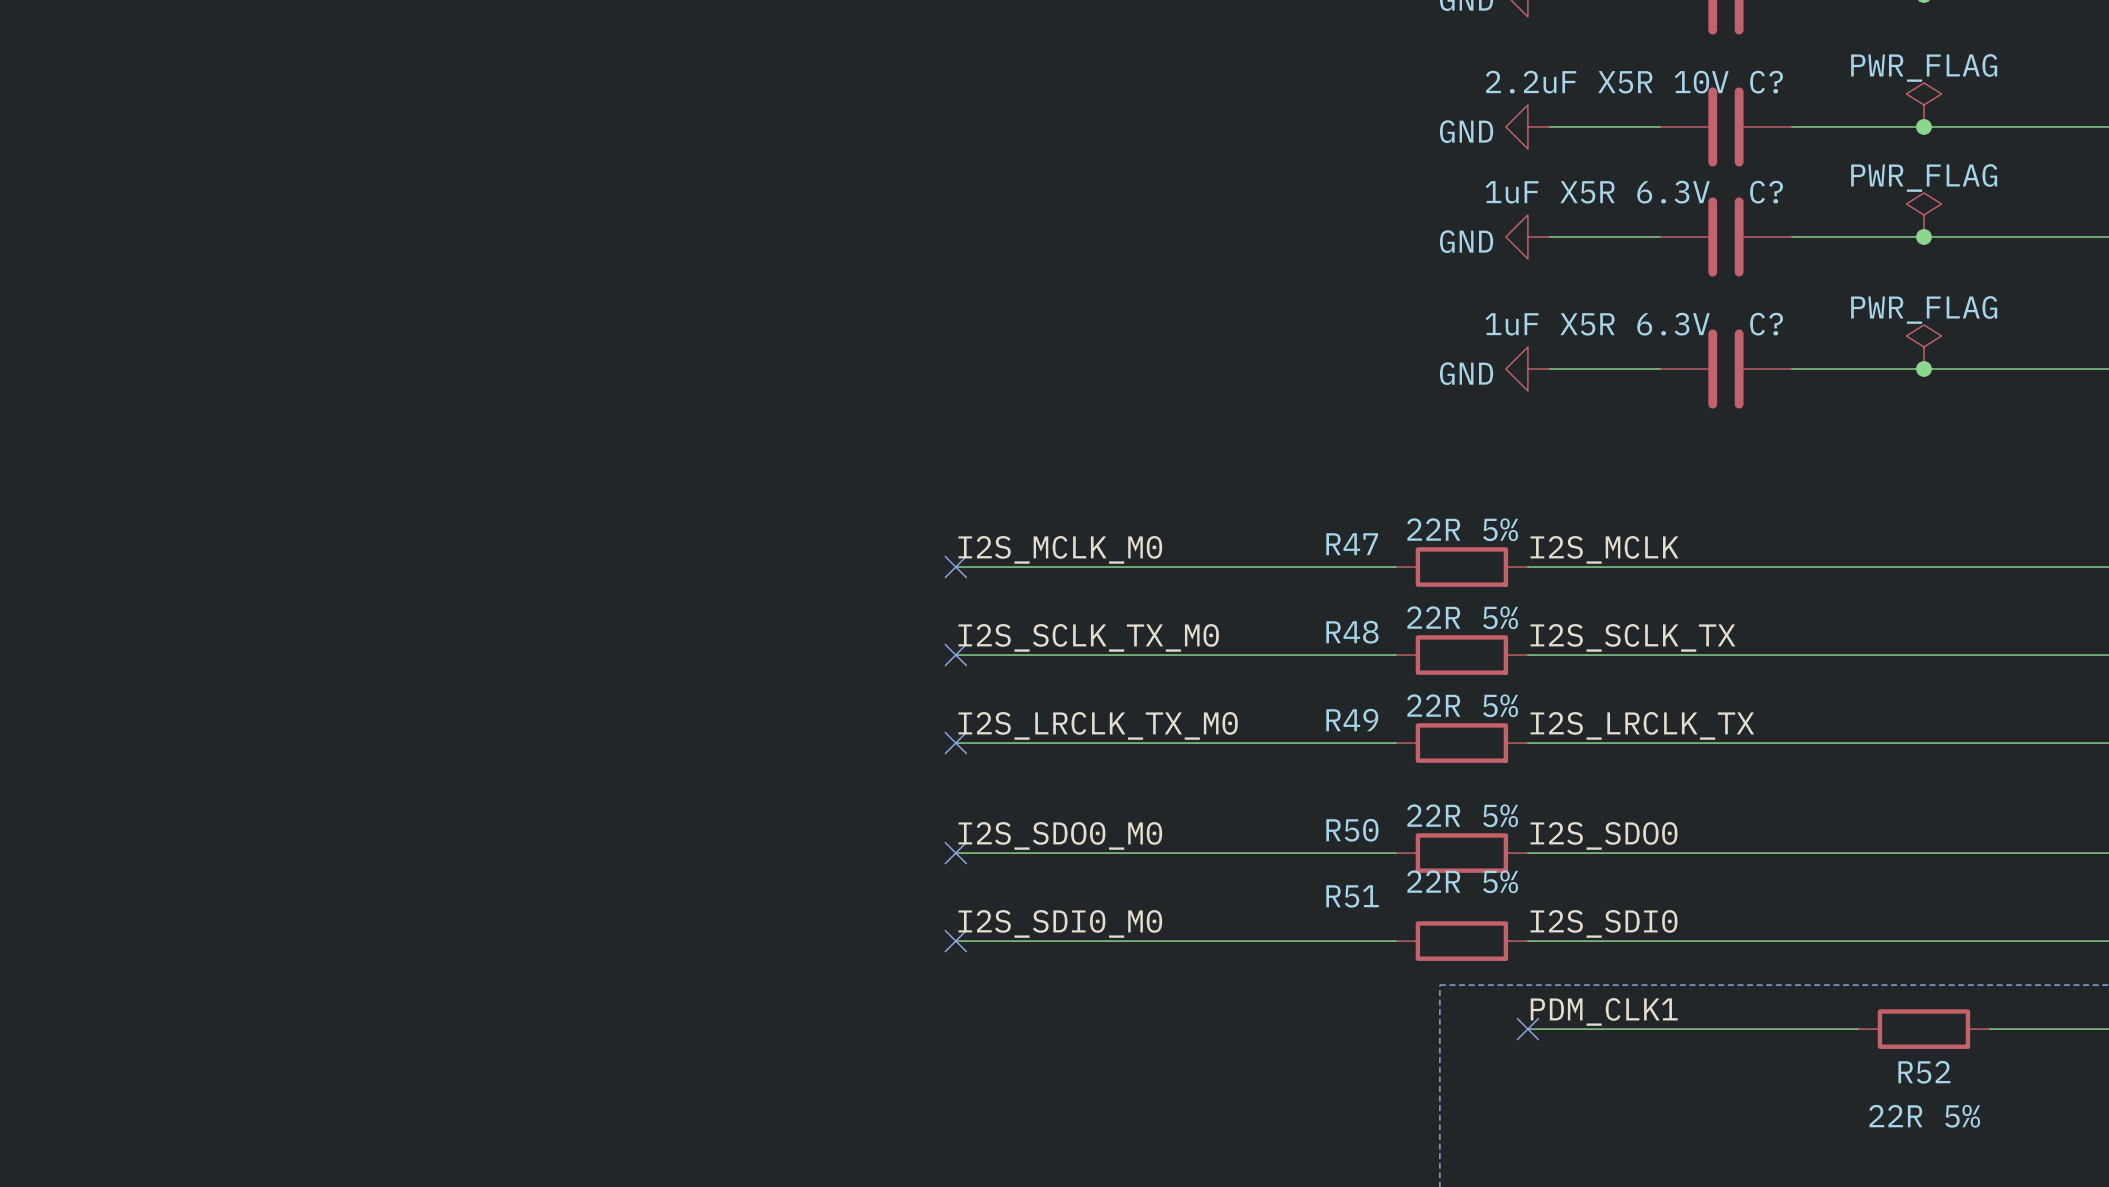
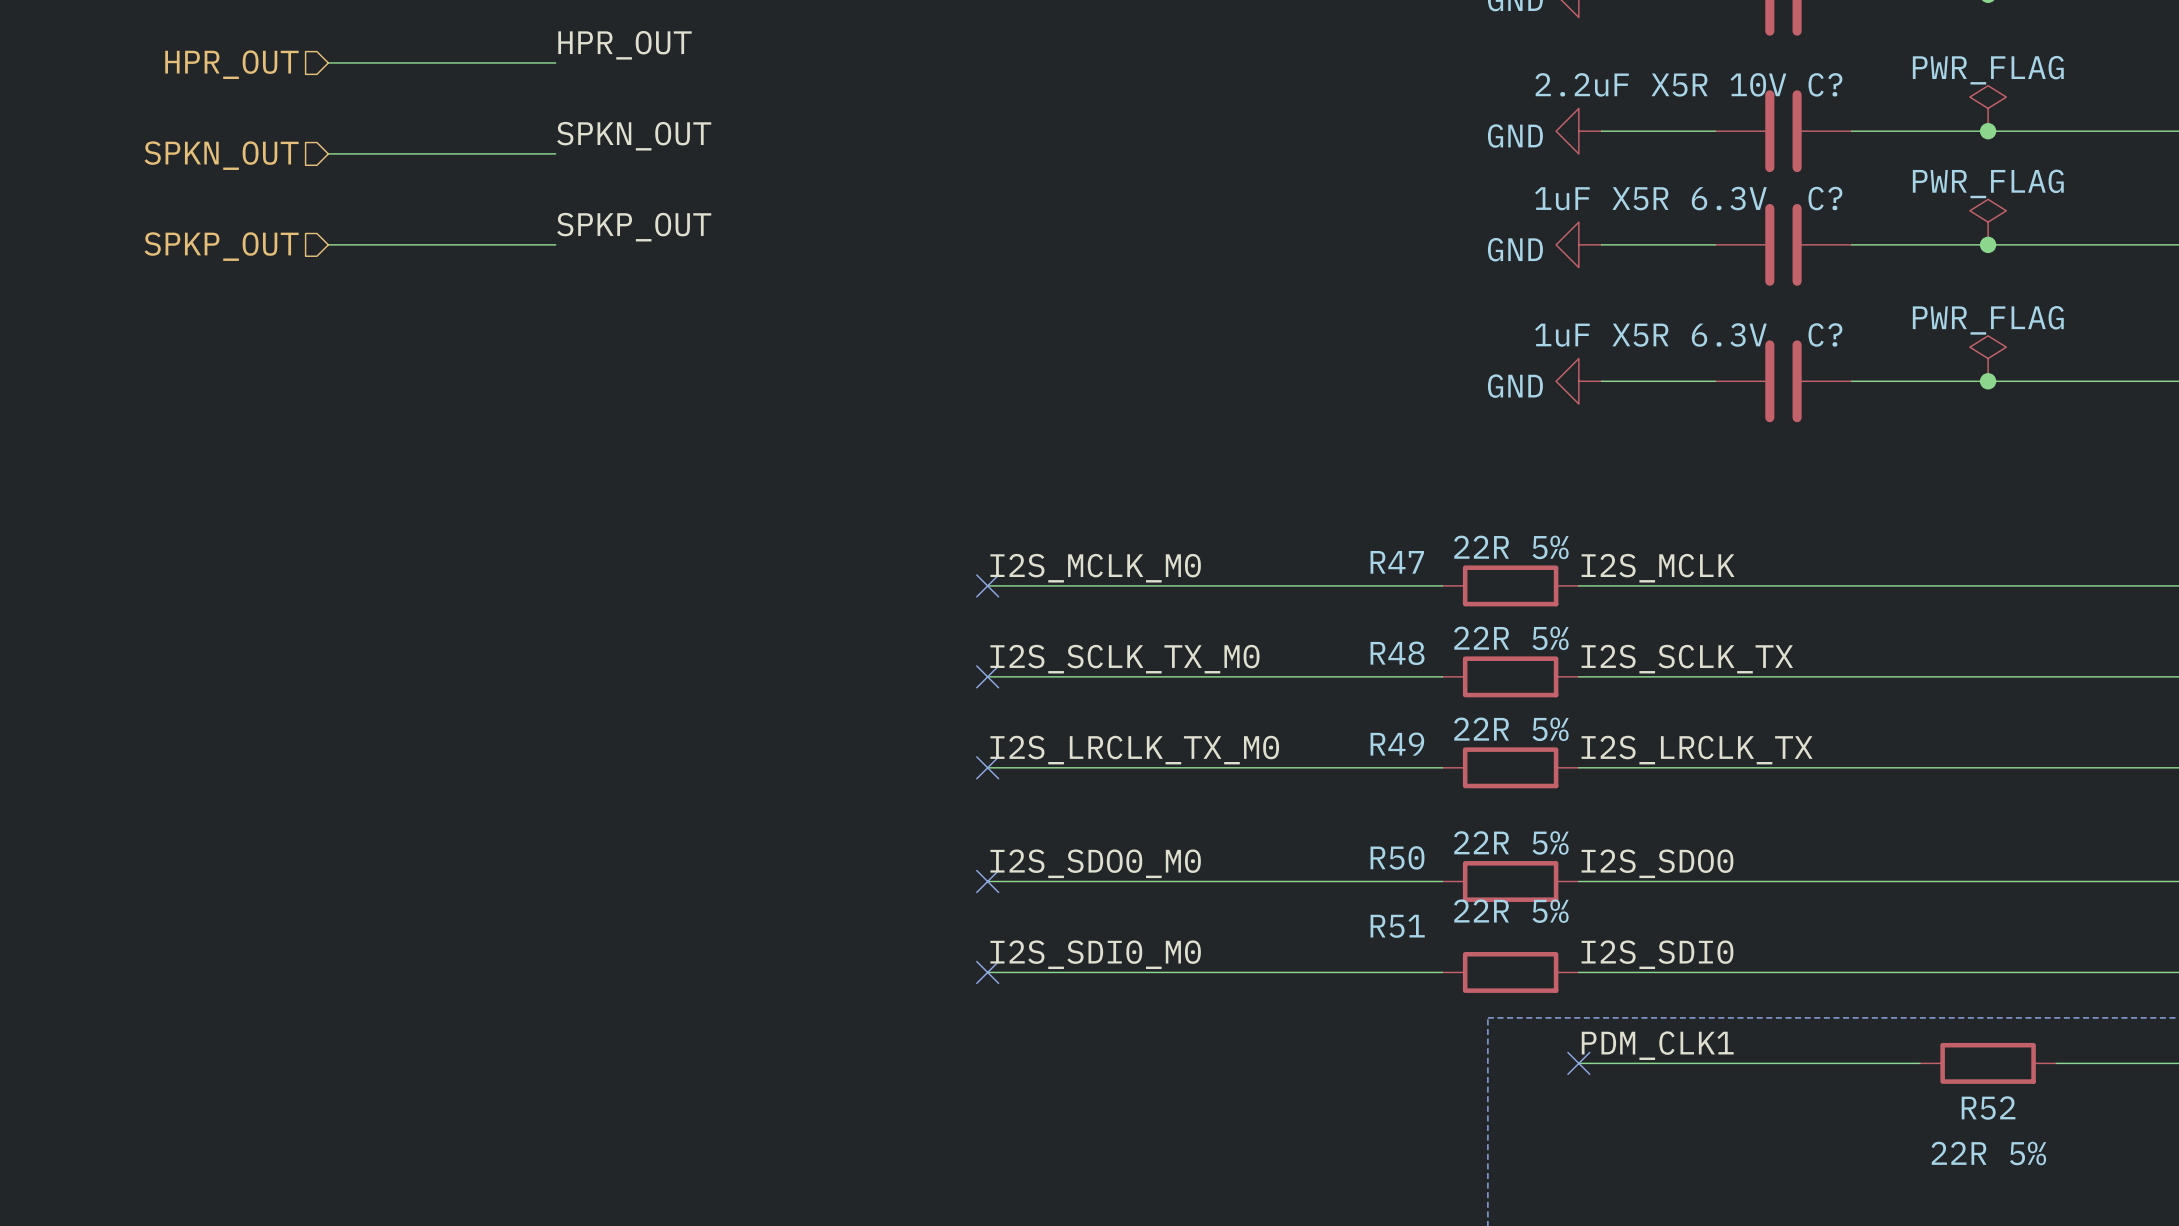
label: none -> HPR_OUT (625, 45)
wire: none -> (328, 62) (555, 62)
hierarchical label: none -> HPR_OUT (231, 64)
label: none -> SPKN_OUT (634, 136)
wire: none -> (328, 153) (555, 153)
hierarchical label: none -> SPKN_OUT (221, 155)
label: none -> SPKP_OUT (634, 227)
wire: none -> (328, 244) (555, 244)
hierarchical label: none -> SPKP_OUT (221, 246)

